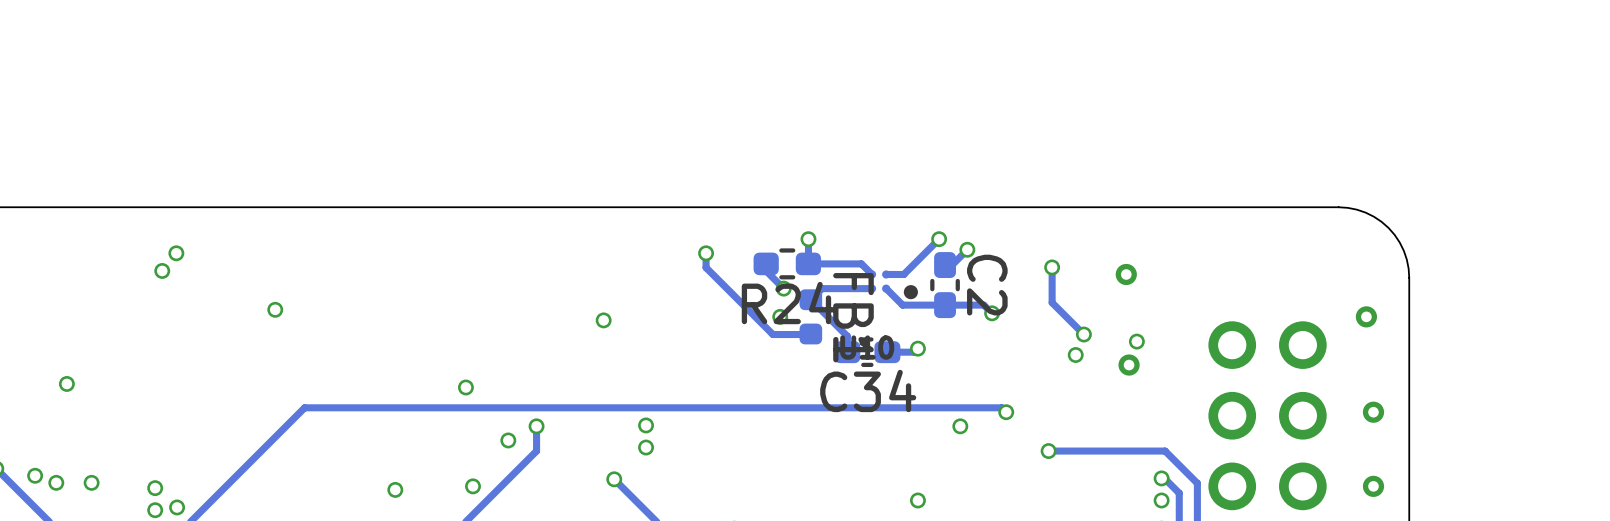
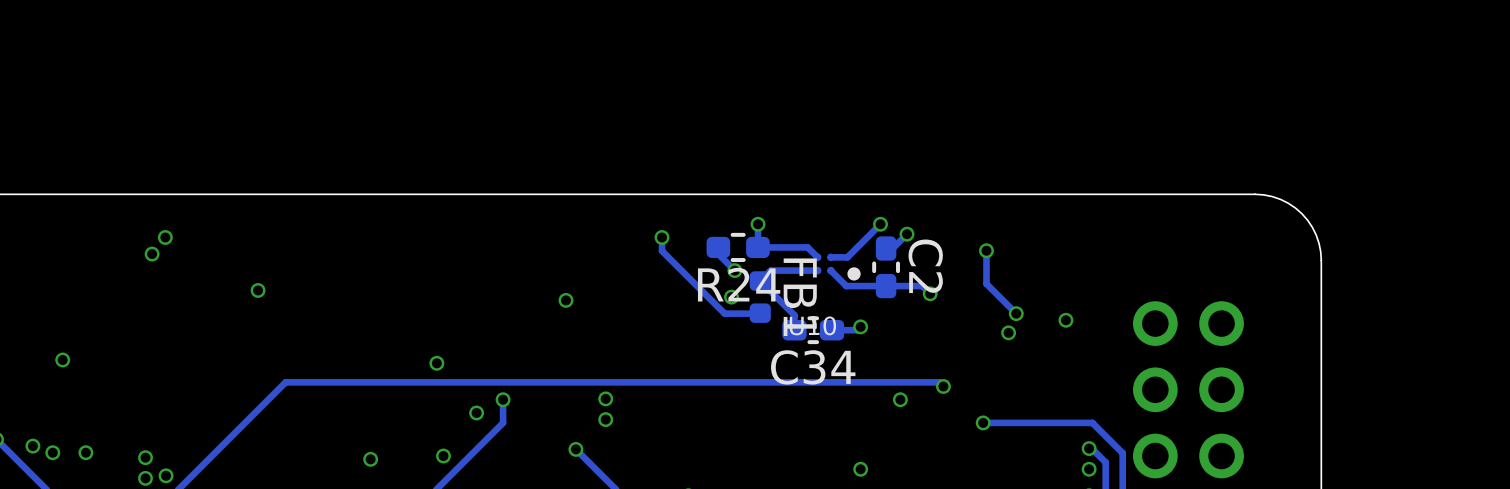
via: (1126, 274) -> none
via: (1366, 316) -> none
via: (1129, 365) -> none
via: (1373, 412) -> none
via: (1373, 486) -> none

